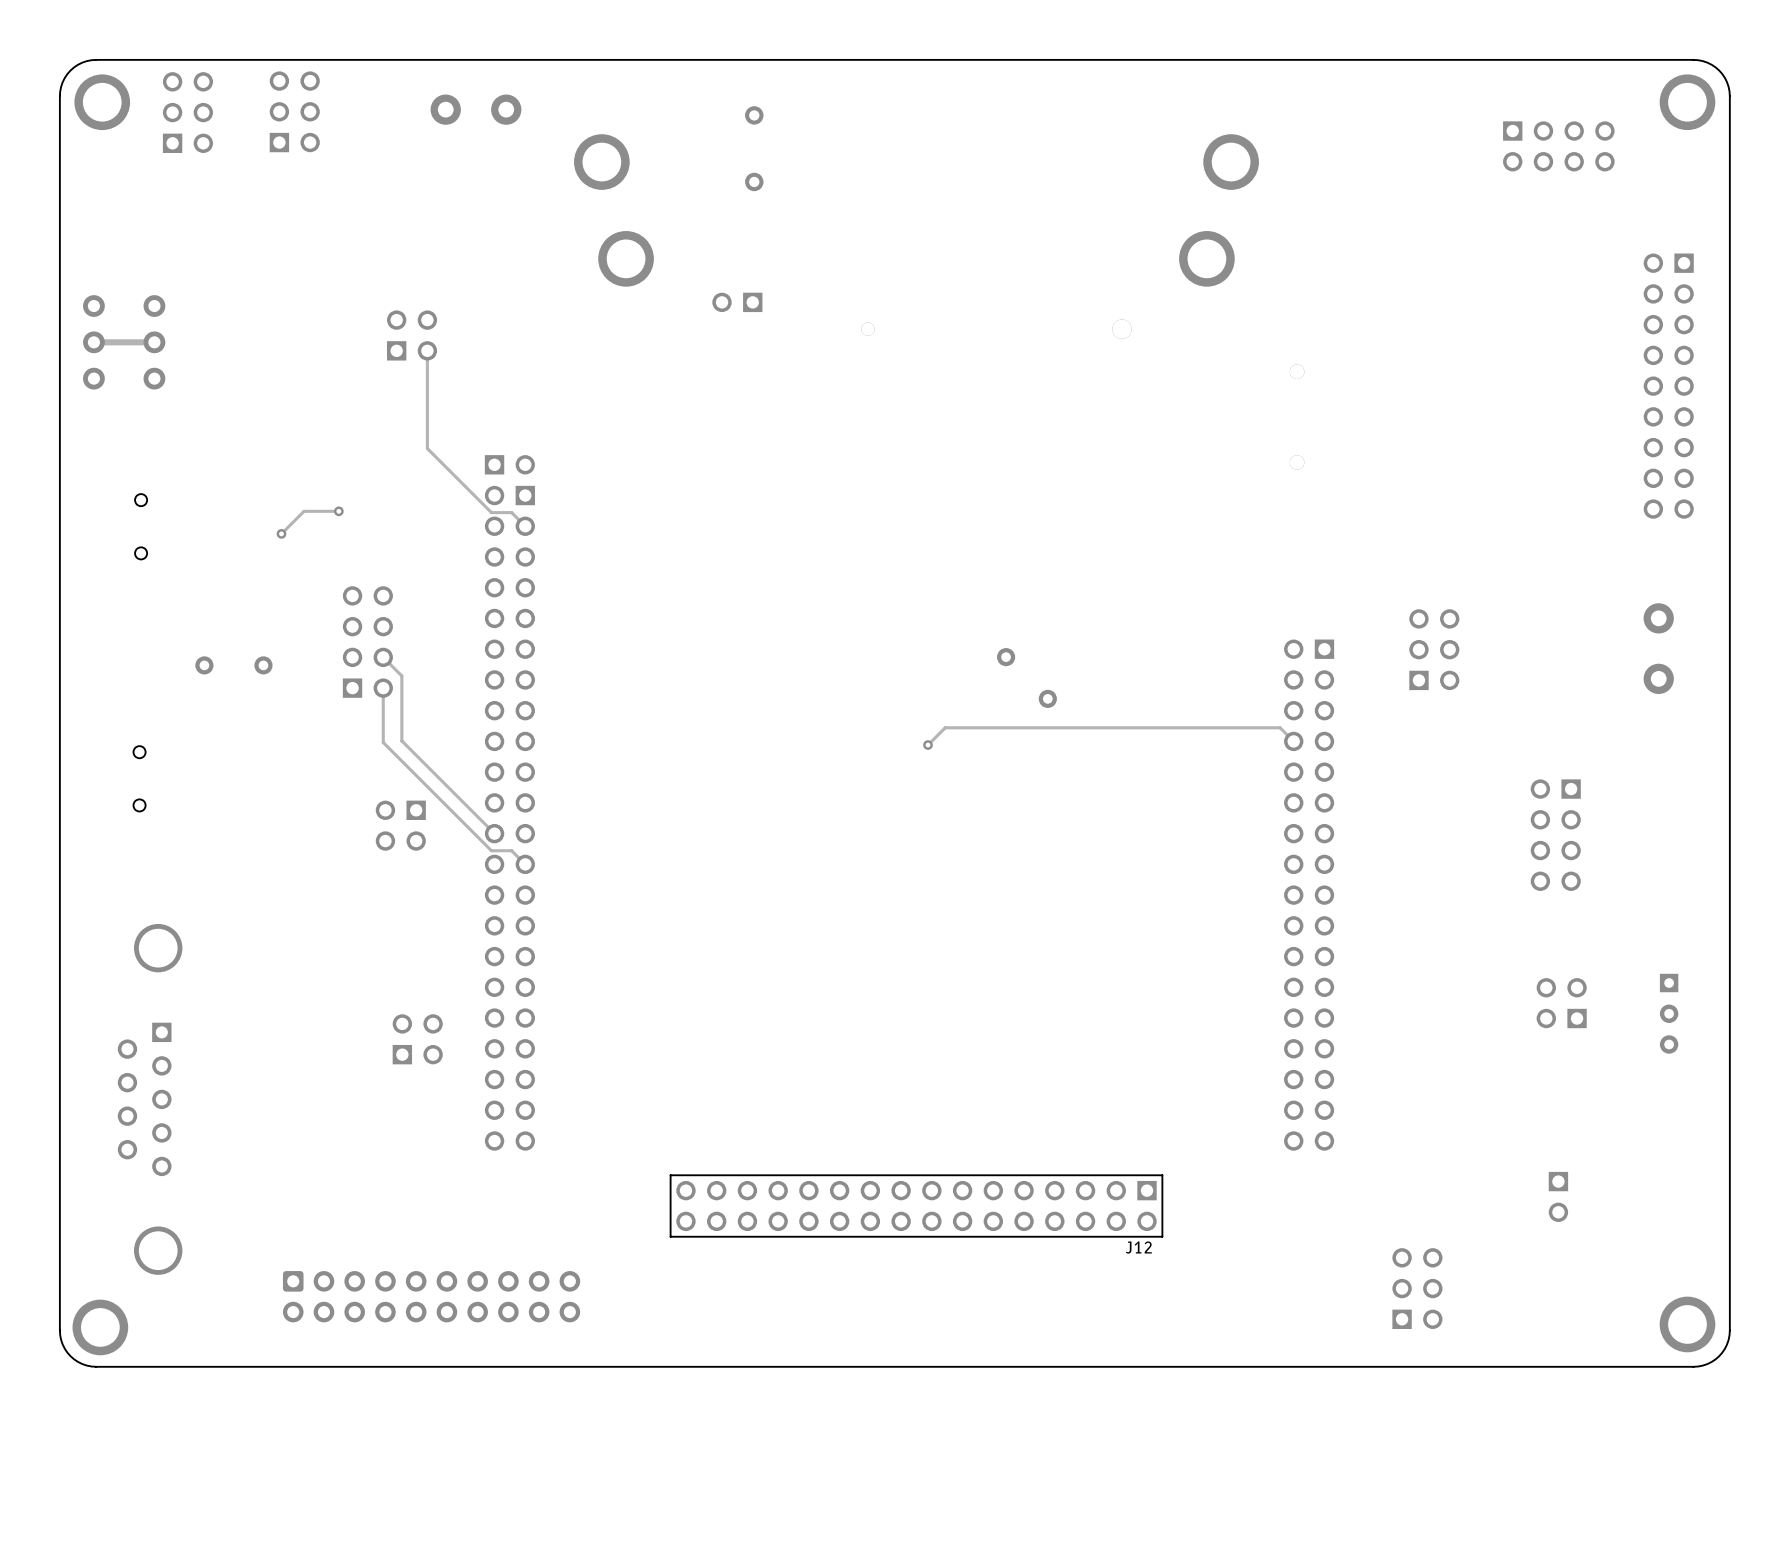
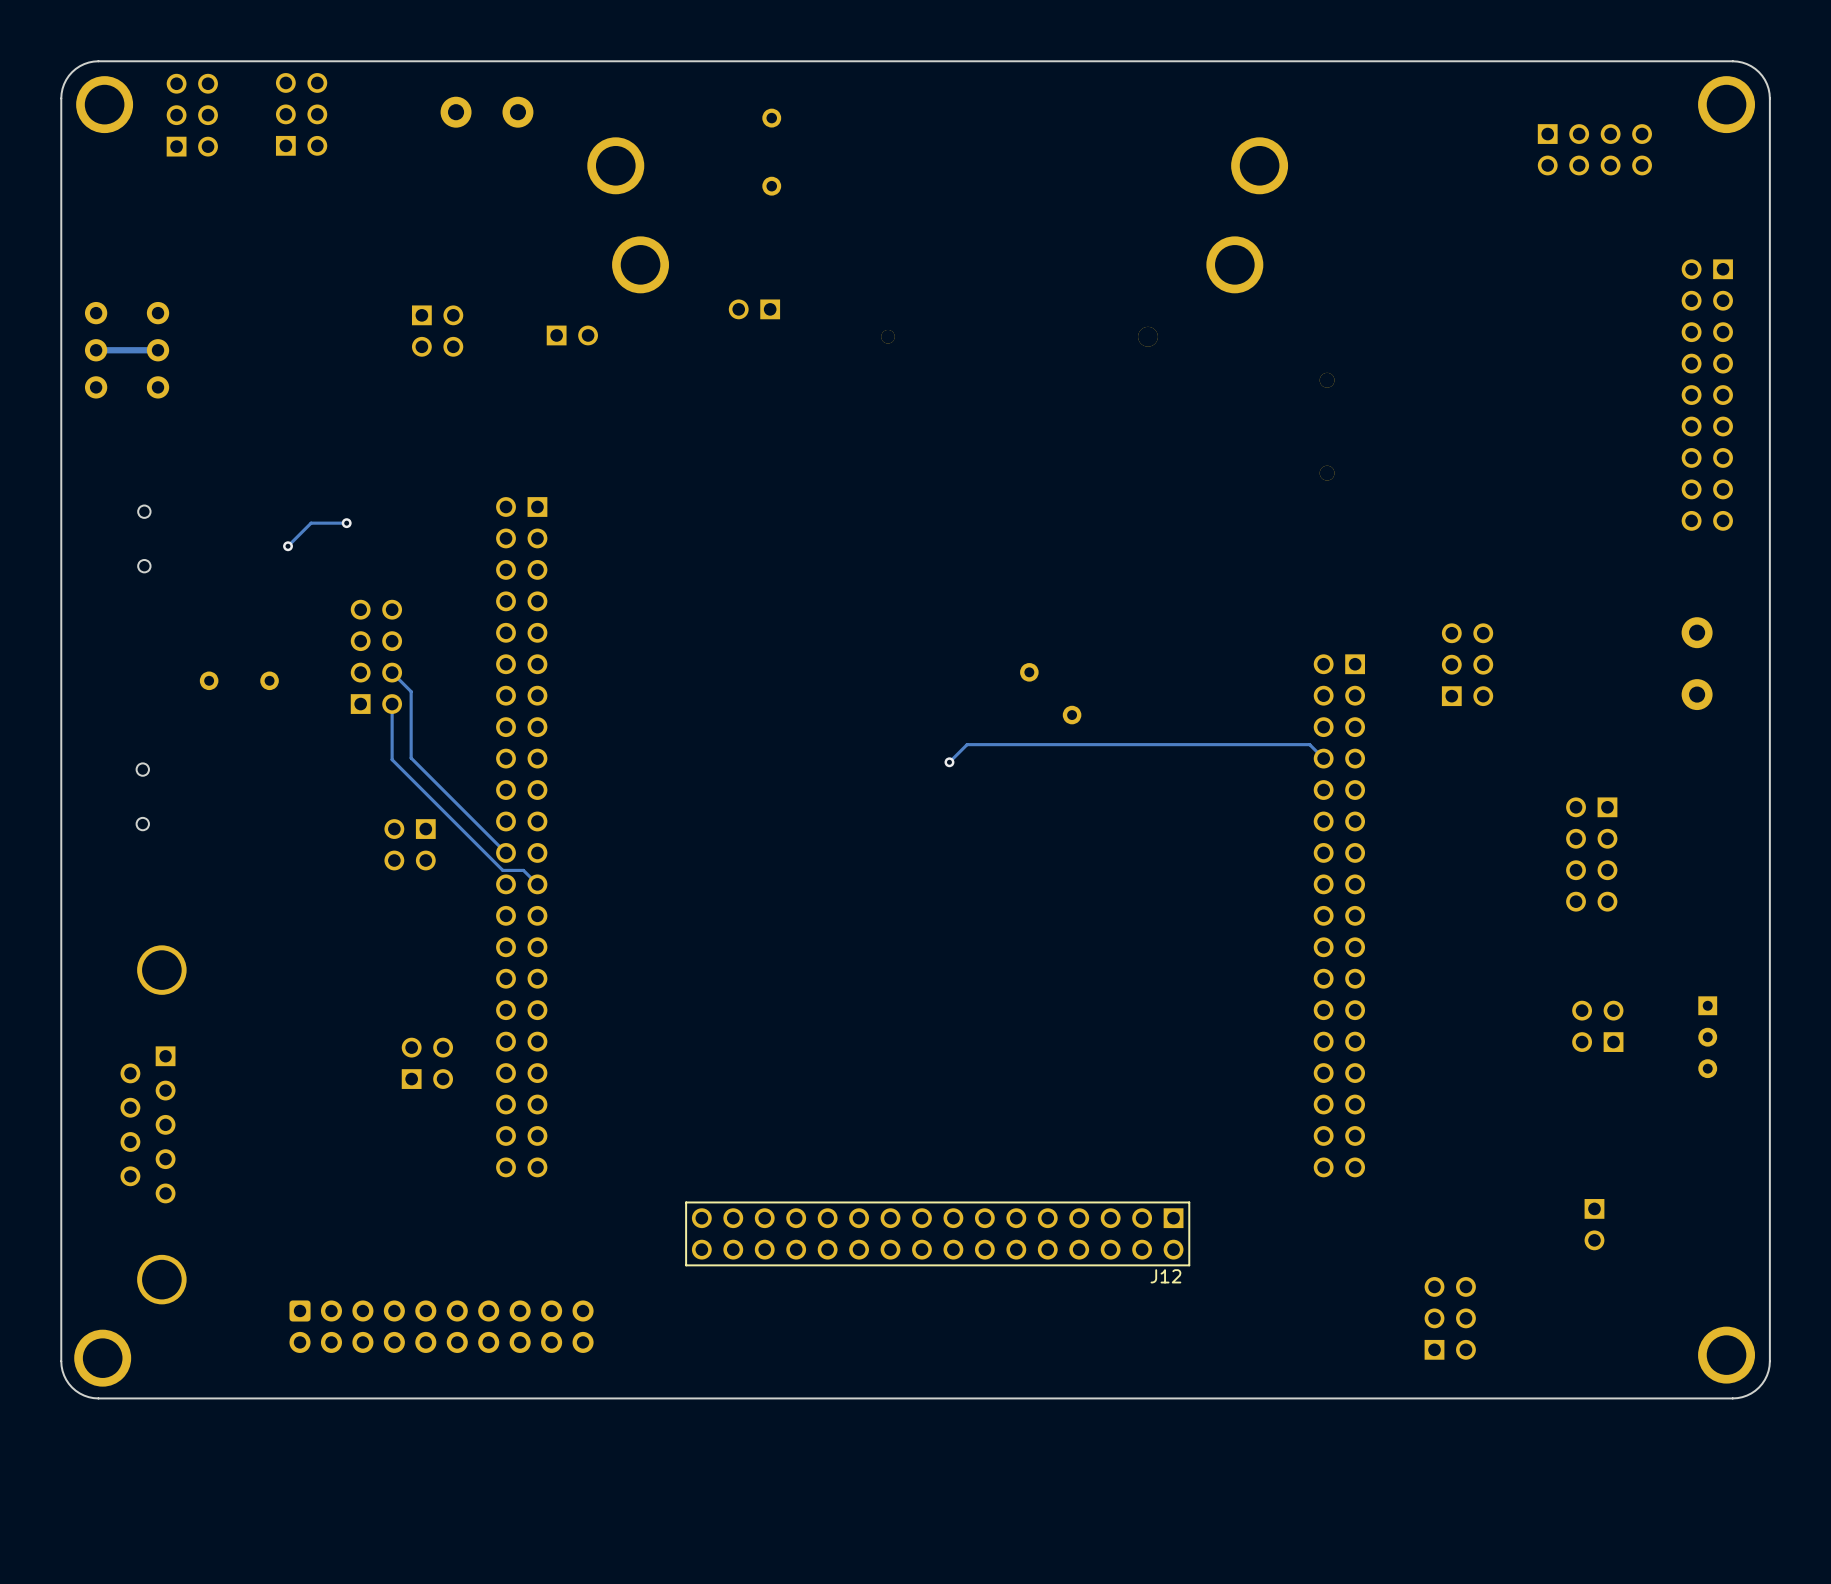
part rotation: 0° (412, 335) -> 90° clockwise (437, 331)
track: (427, 350) (427, 448) (491, 512) (511, 512) (525, 526) -> none
part position: (509, 464) -> (572, 335)

